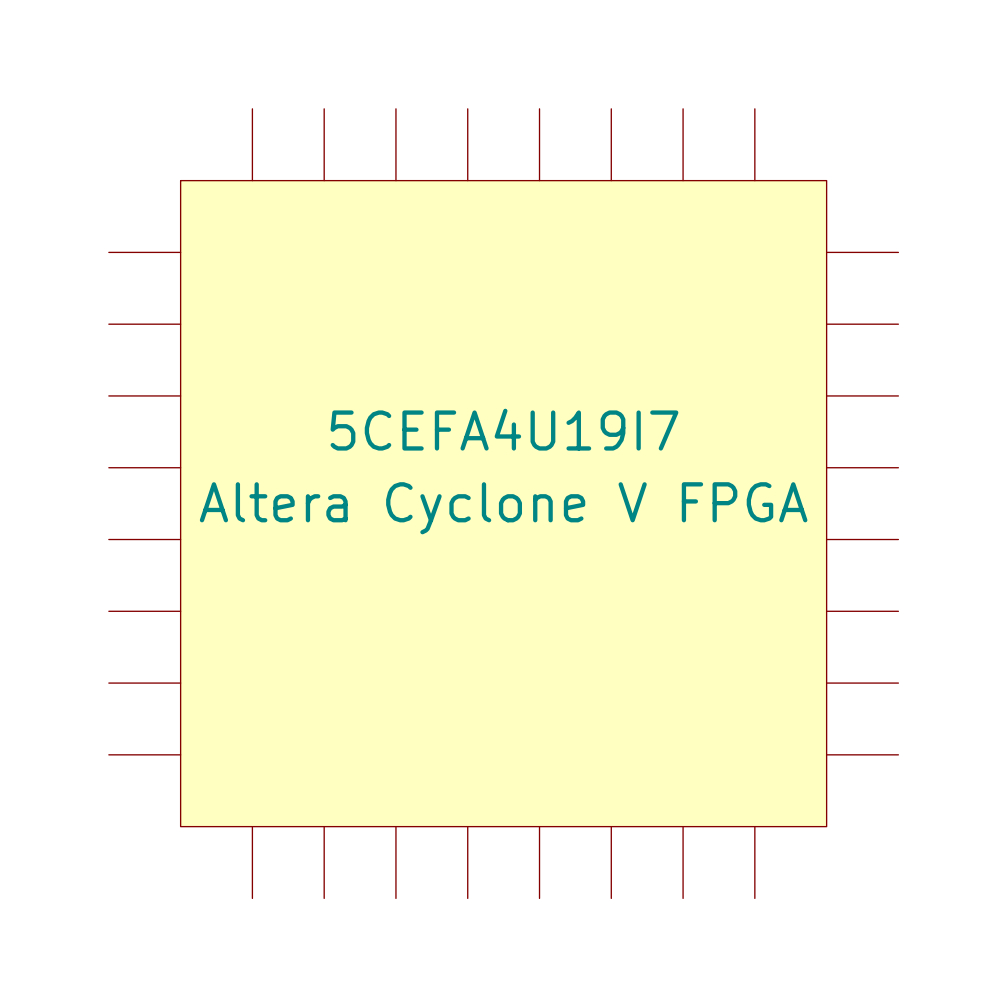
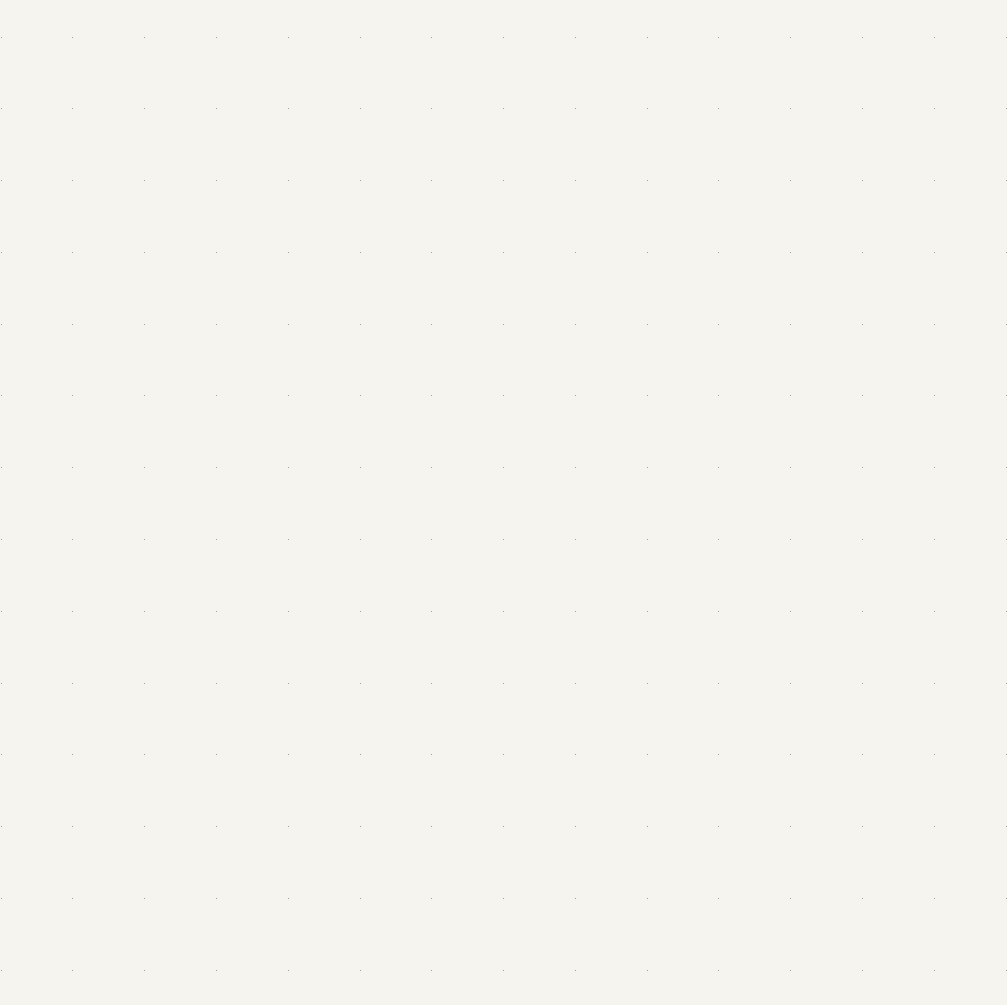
part: 5CEFA4U19I7 (503, 503) -> none

